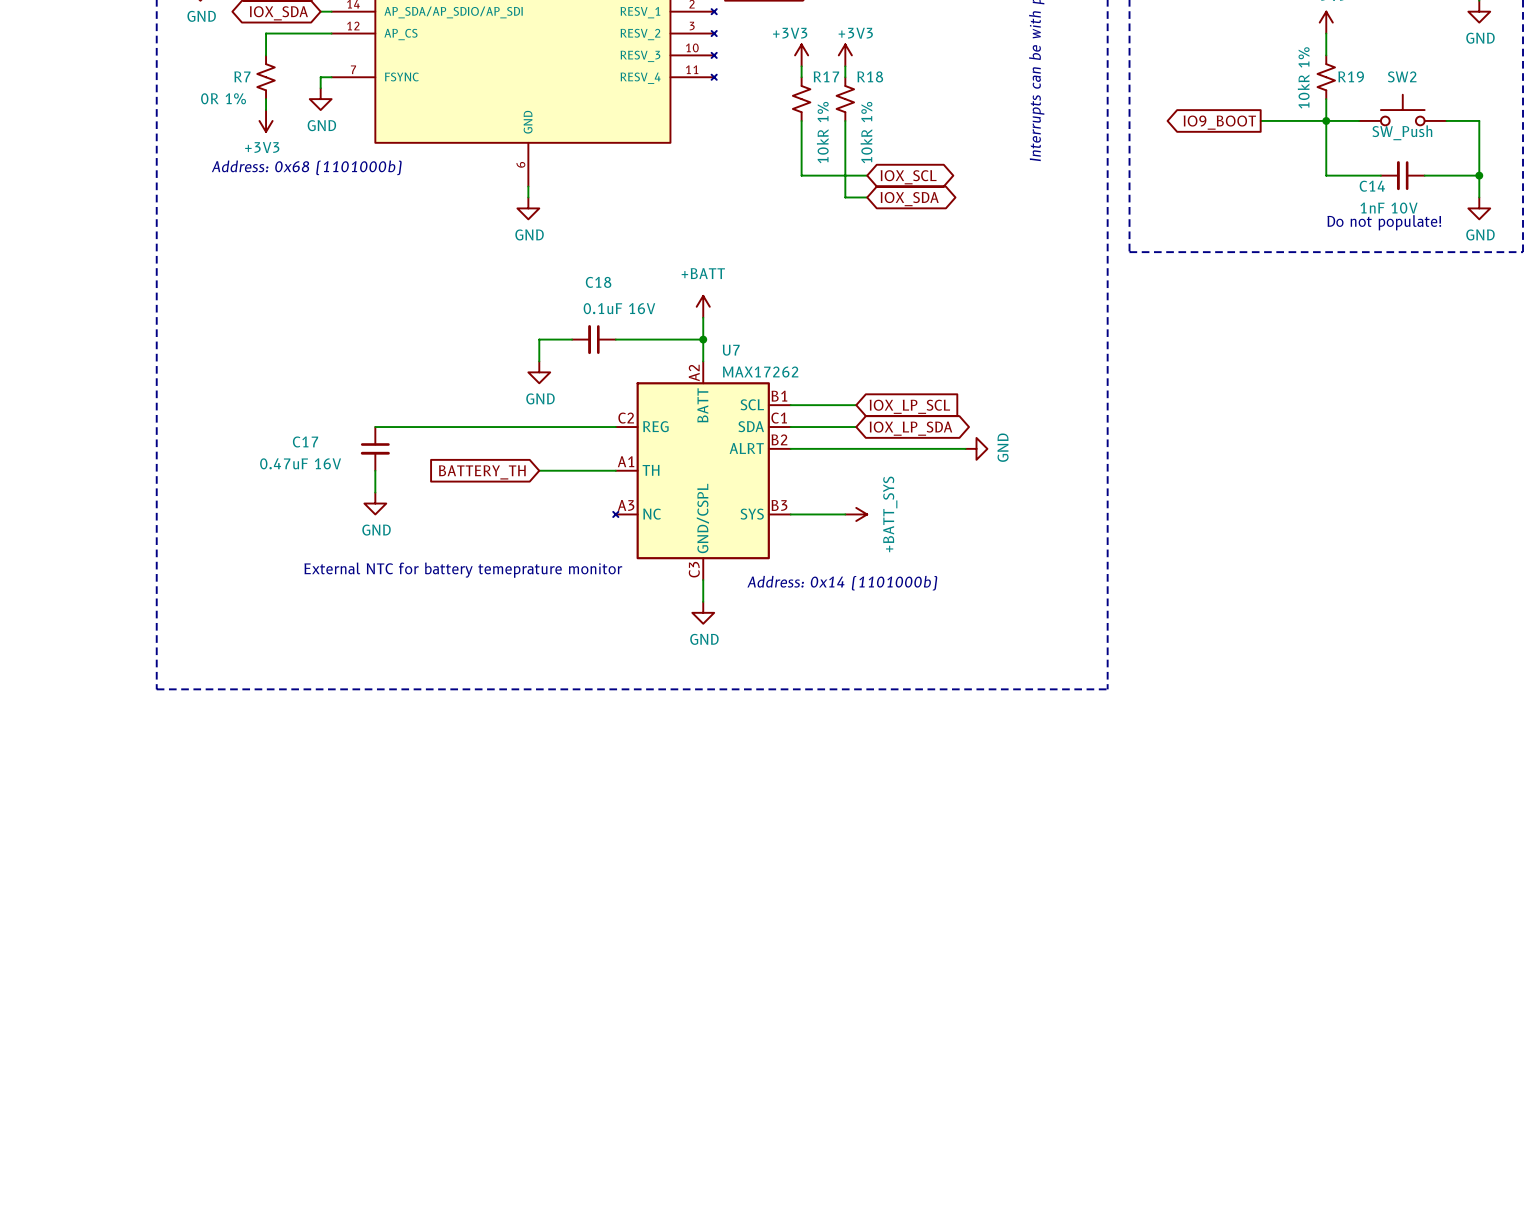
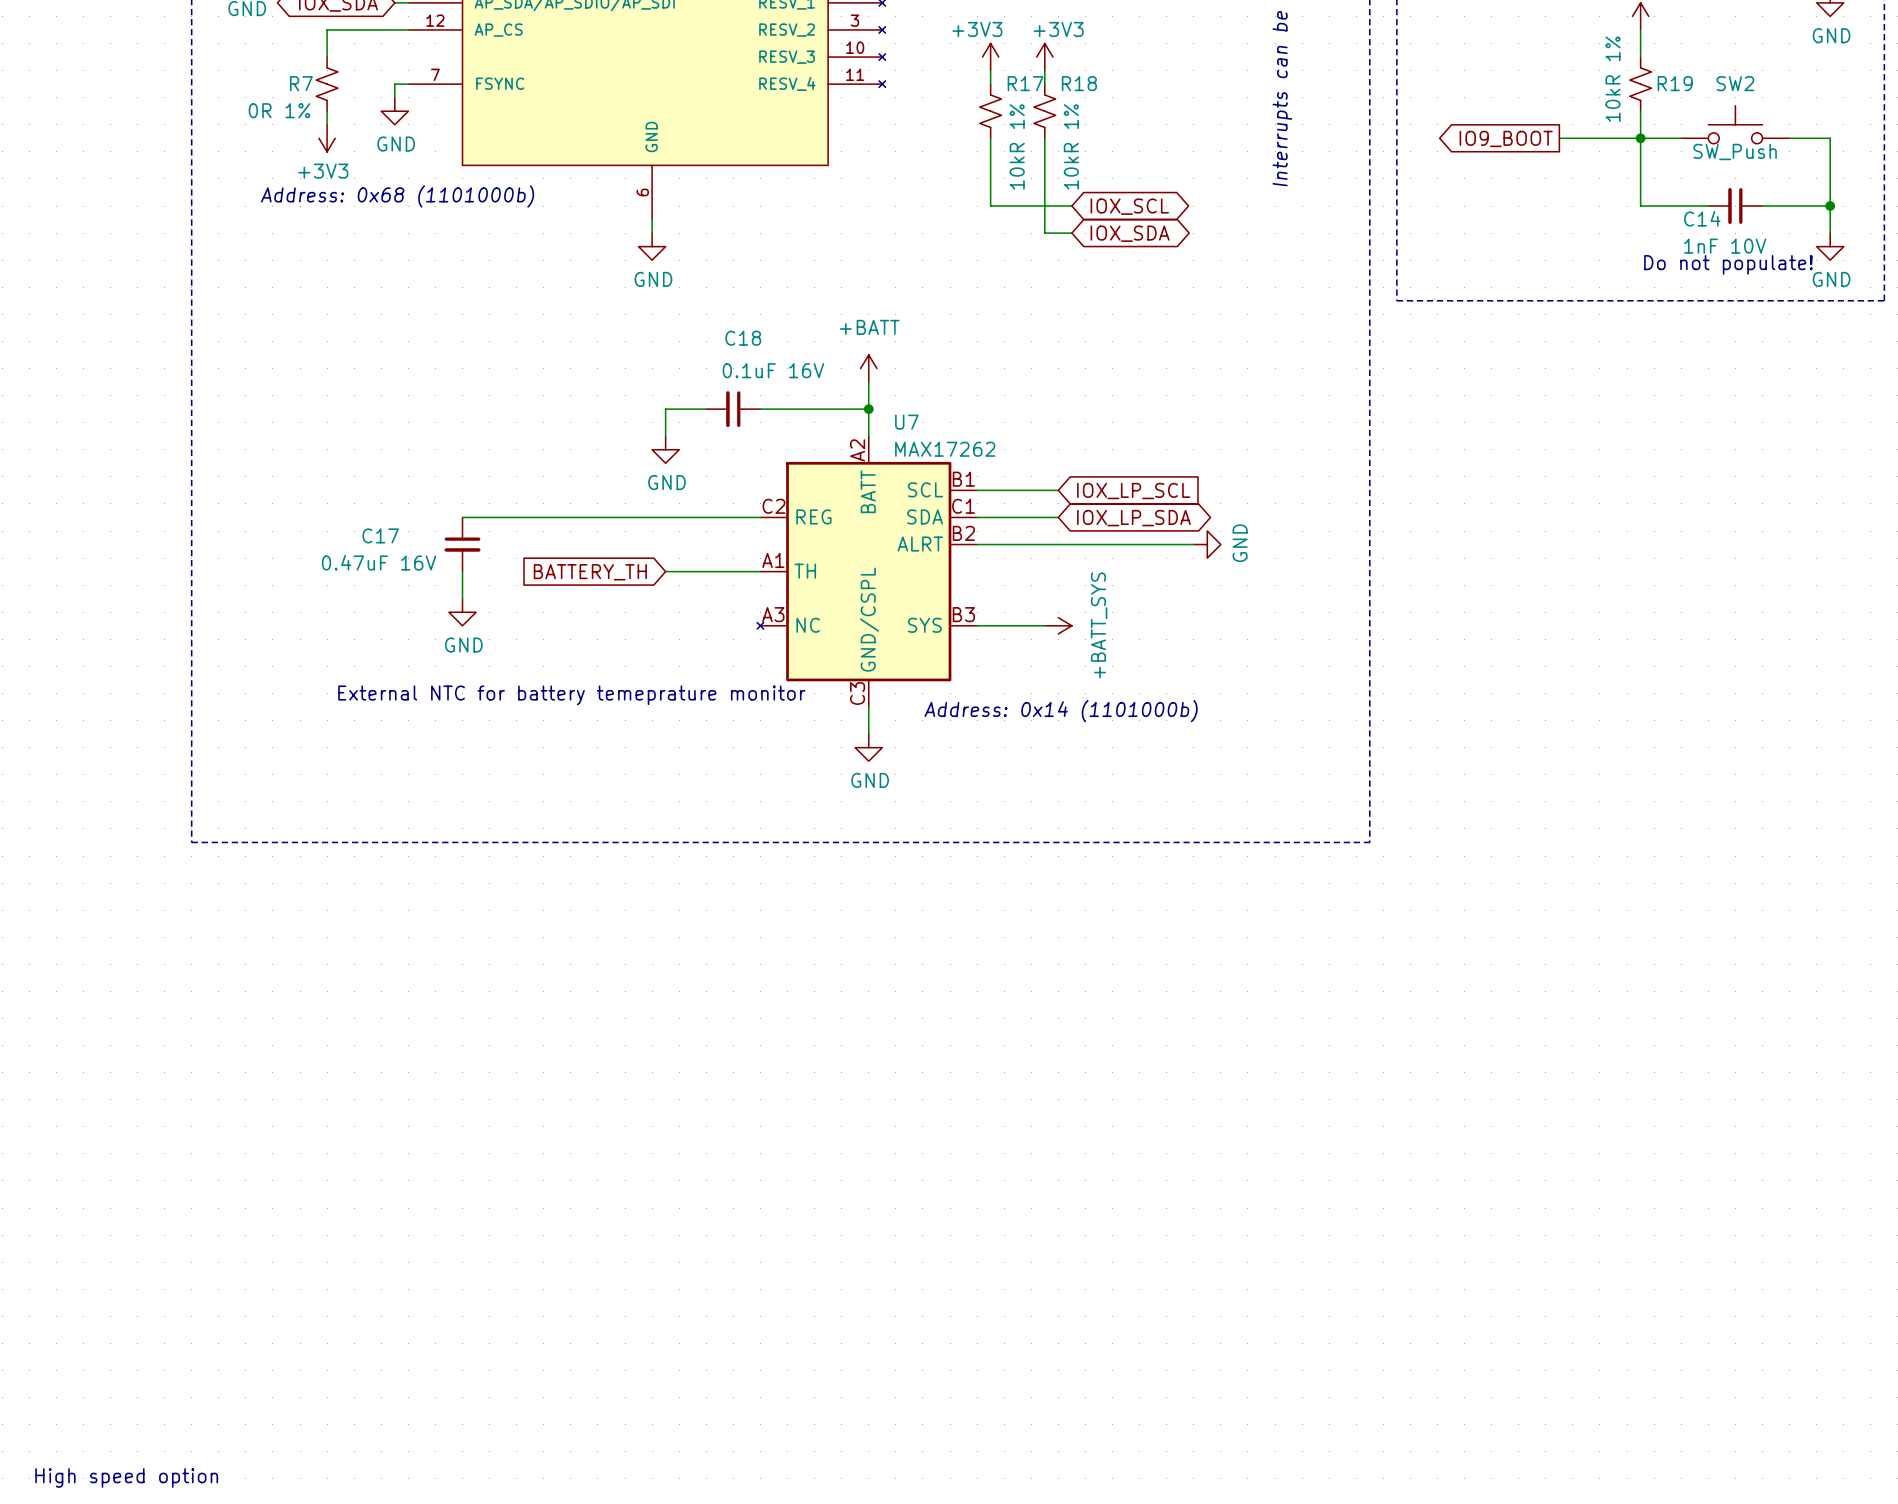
text: none -> High speed option (126, 1477)

